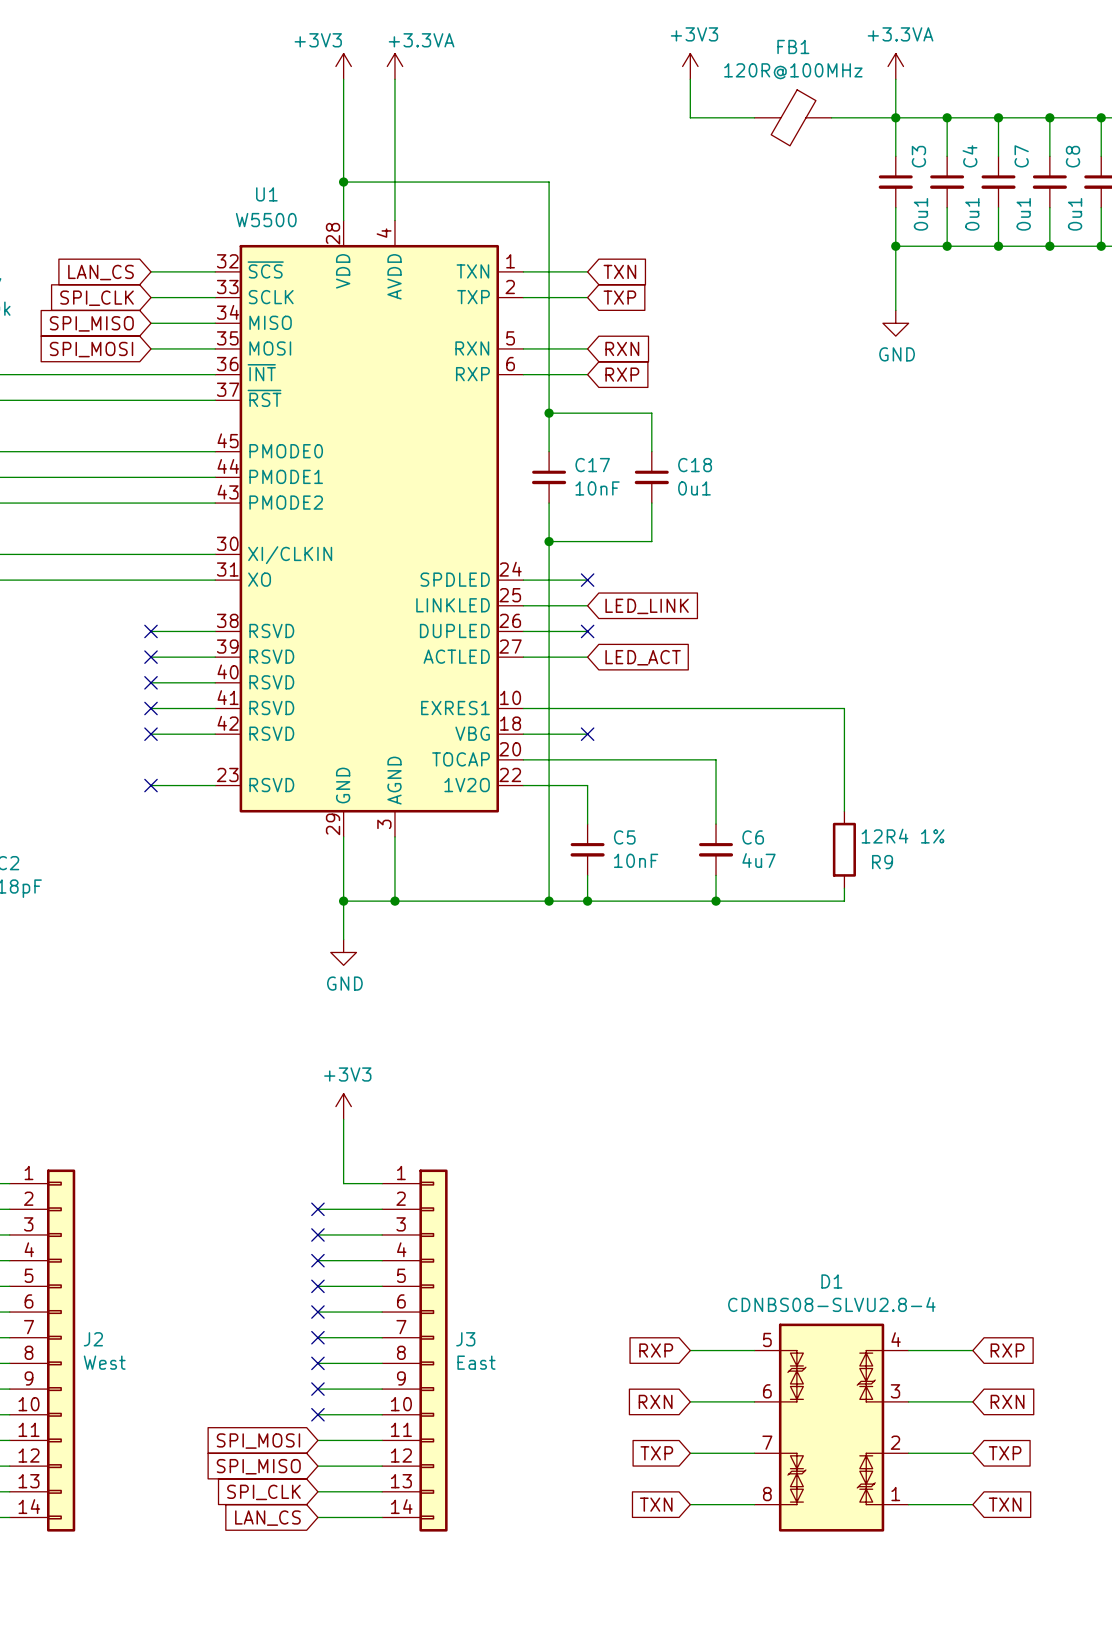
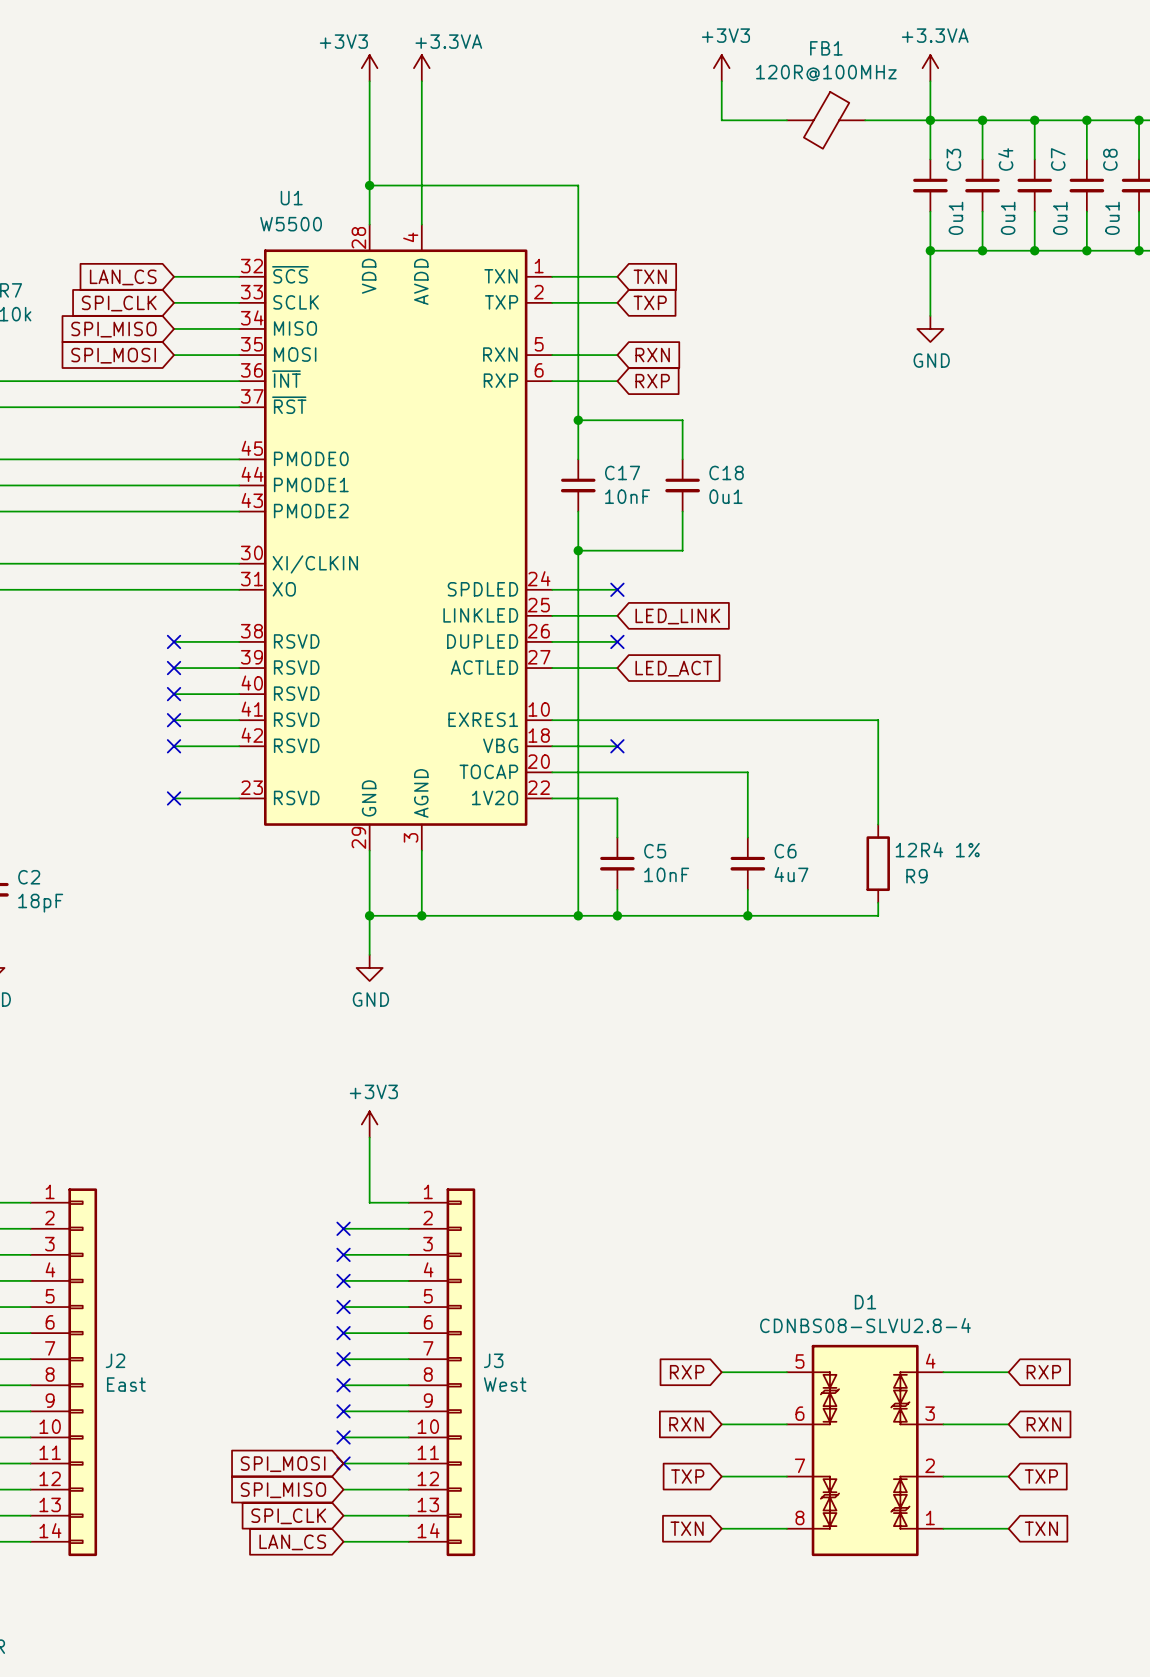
J2 value: West (104, 1362) -> East (126, 1384)
J3 value: East (476, 1362) -> West (505, 1384)
no-connect mark: none -> (343, 1463)

